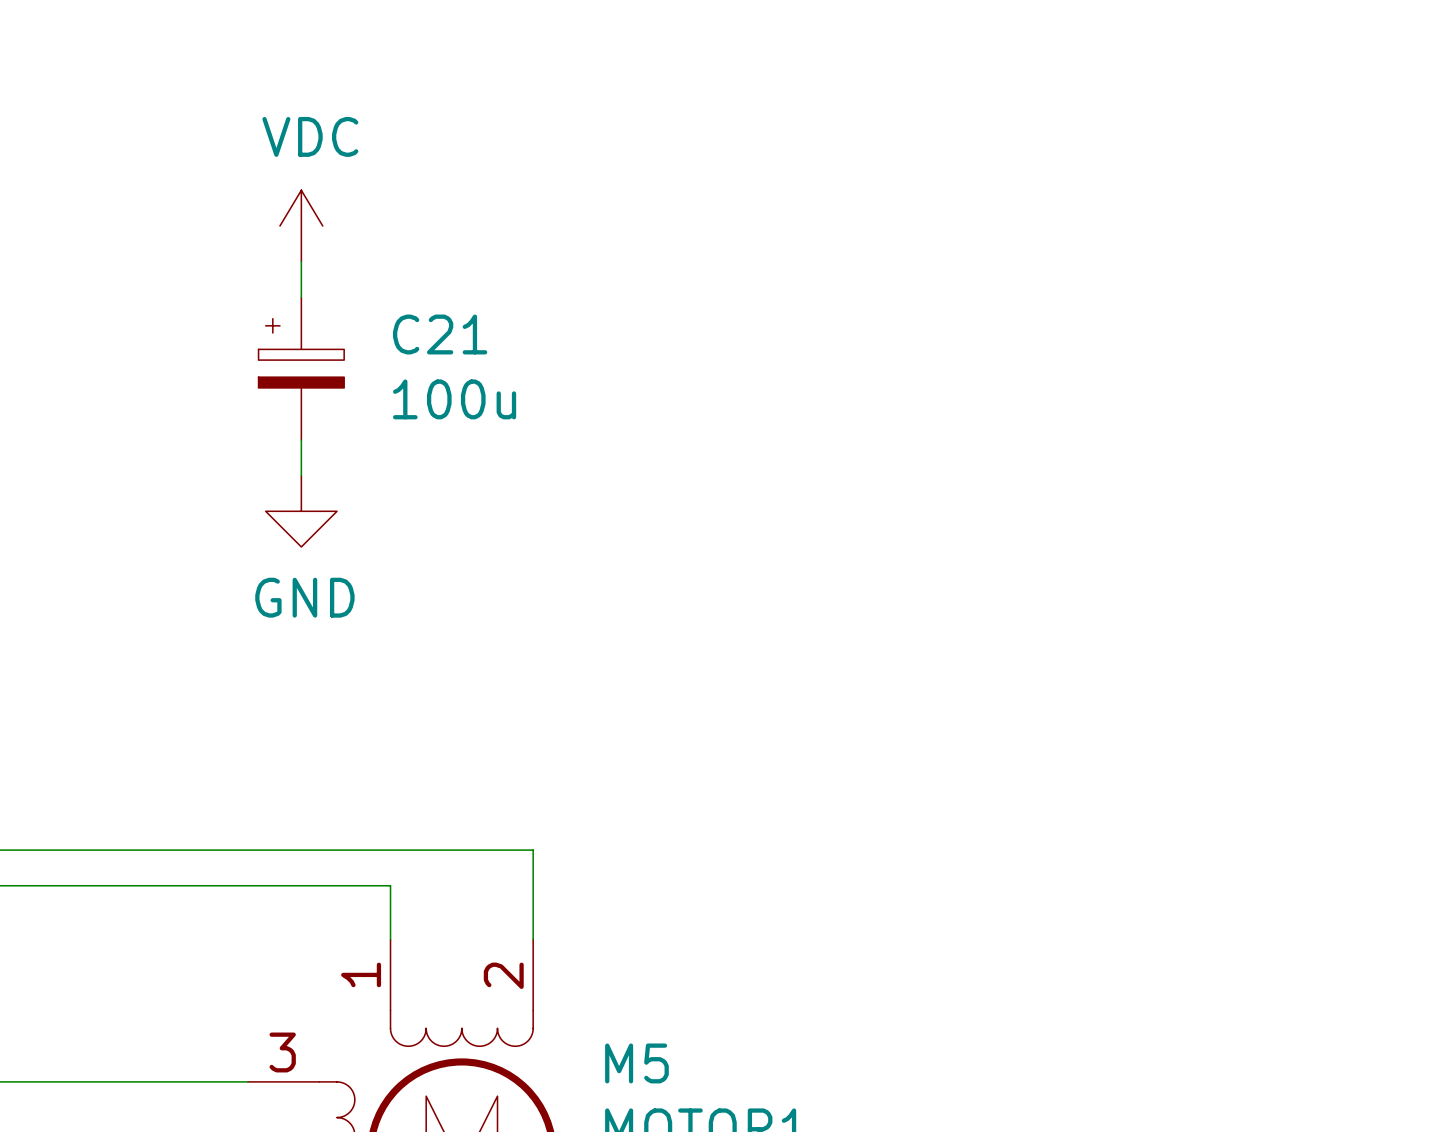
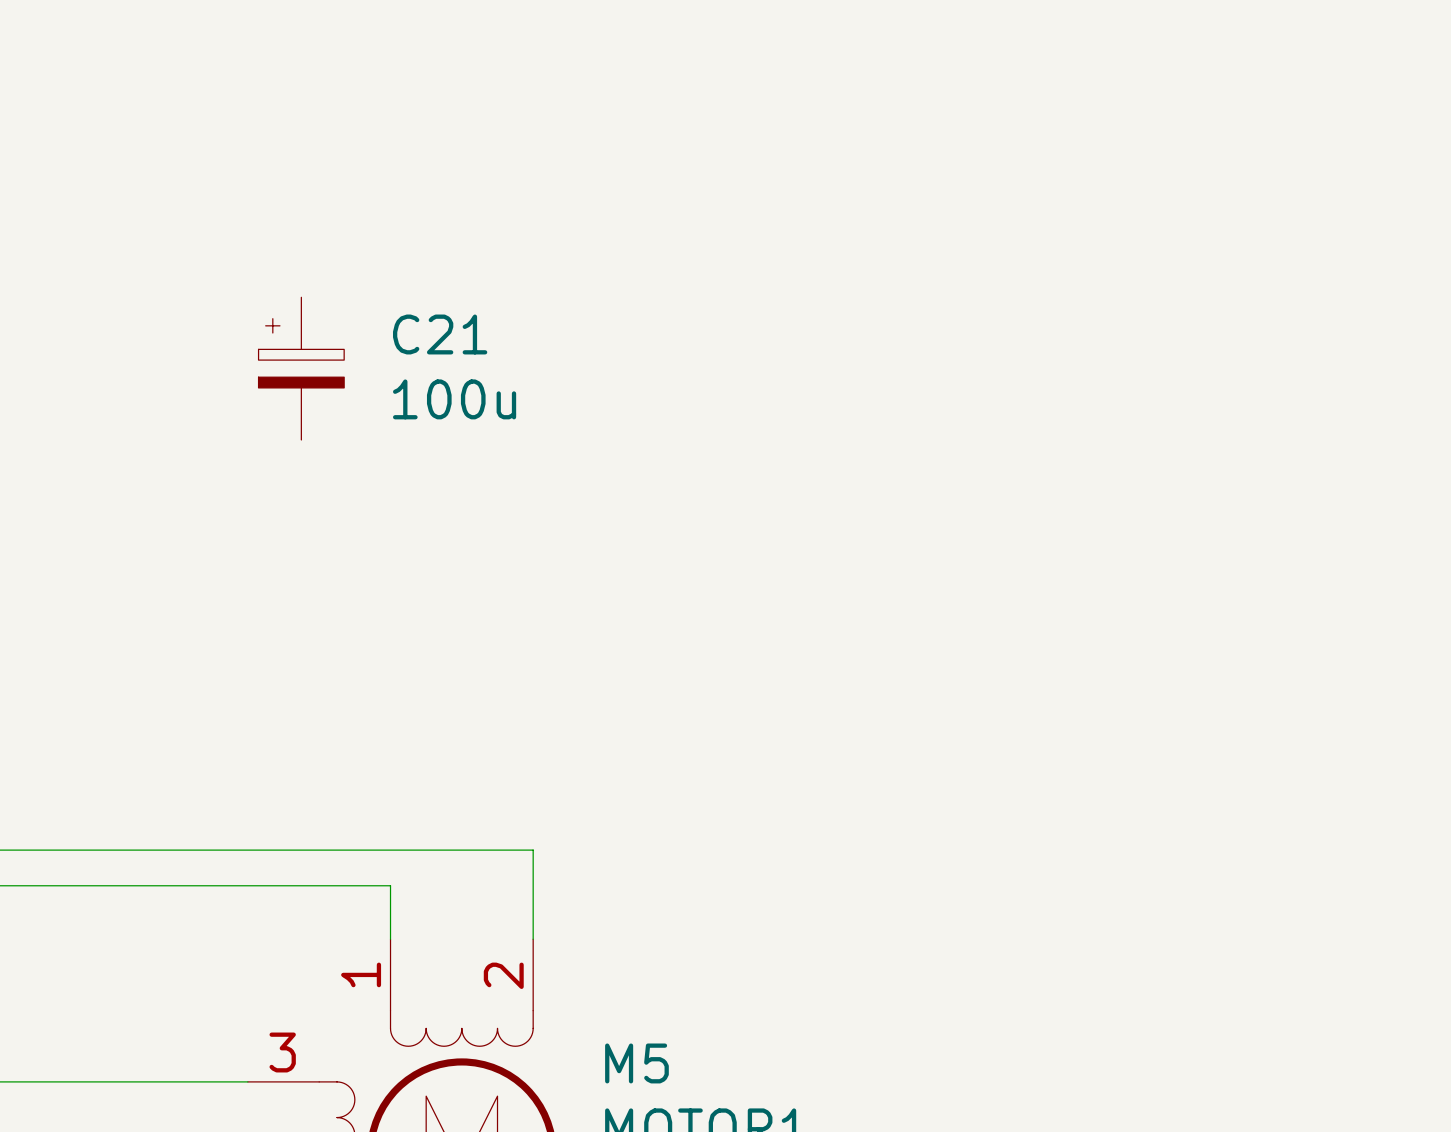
power symbol: VDC (301, 225) -> none
wire: (301, 261) (301, 297) -> none
wire: (301, 439) (301, 475) -> none
power symbol: GND (301, 511) -> none

